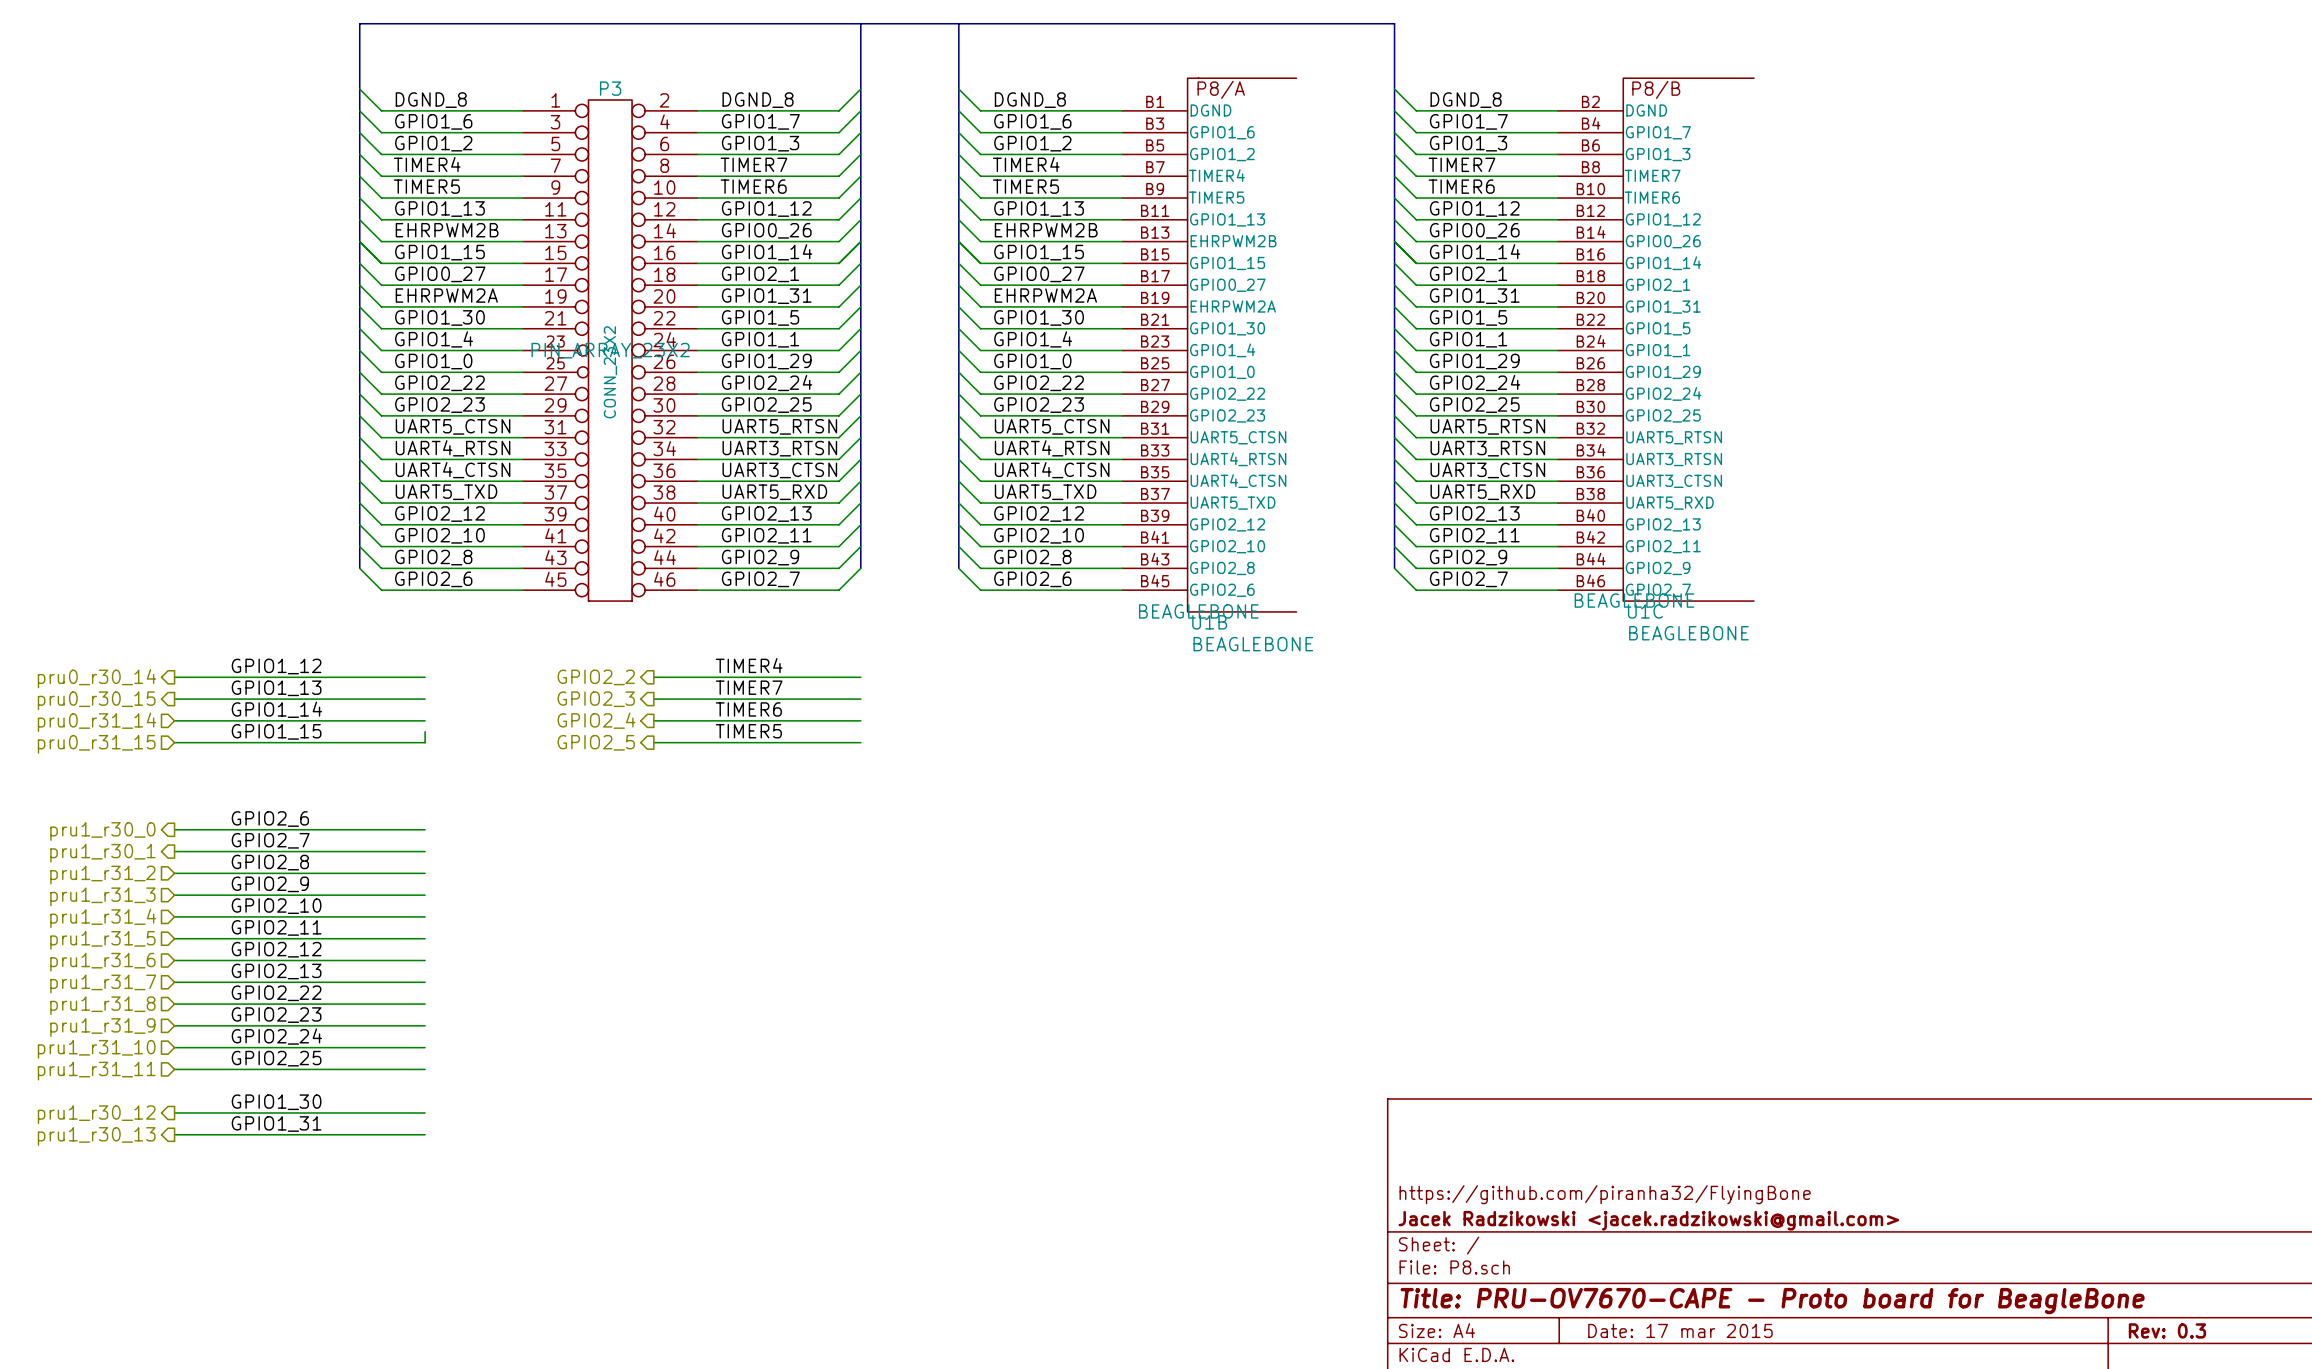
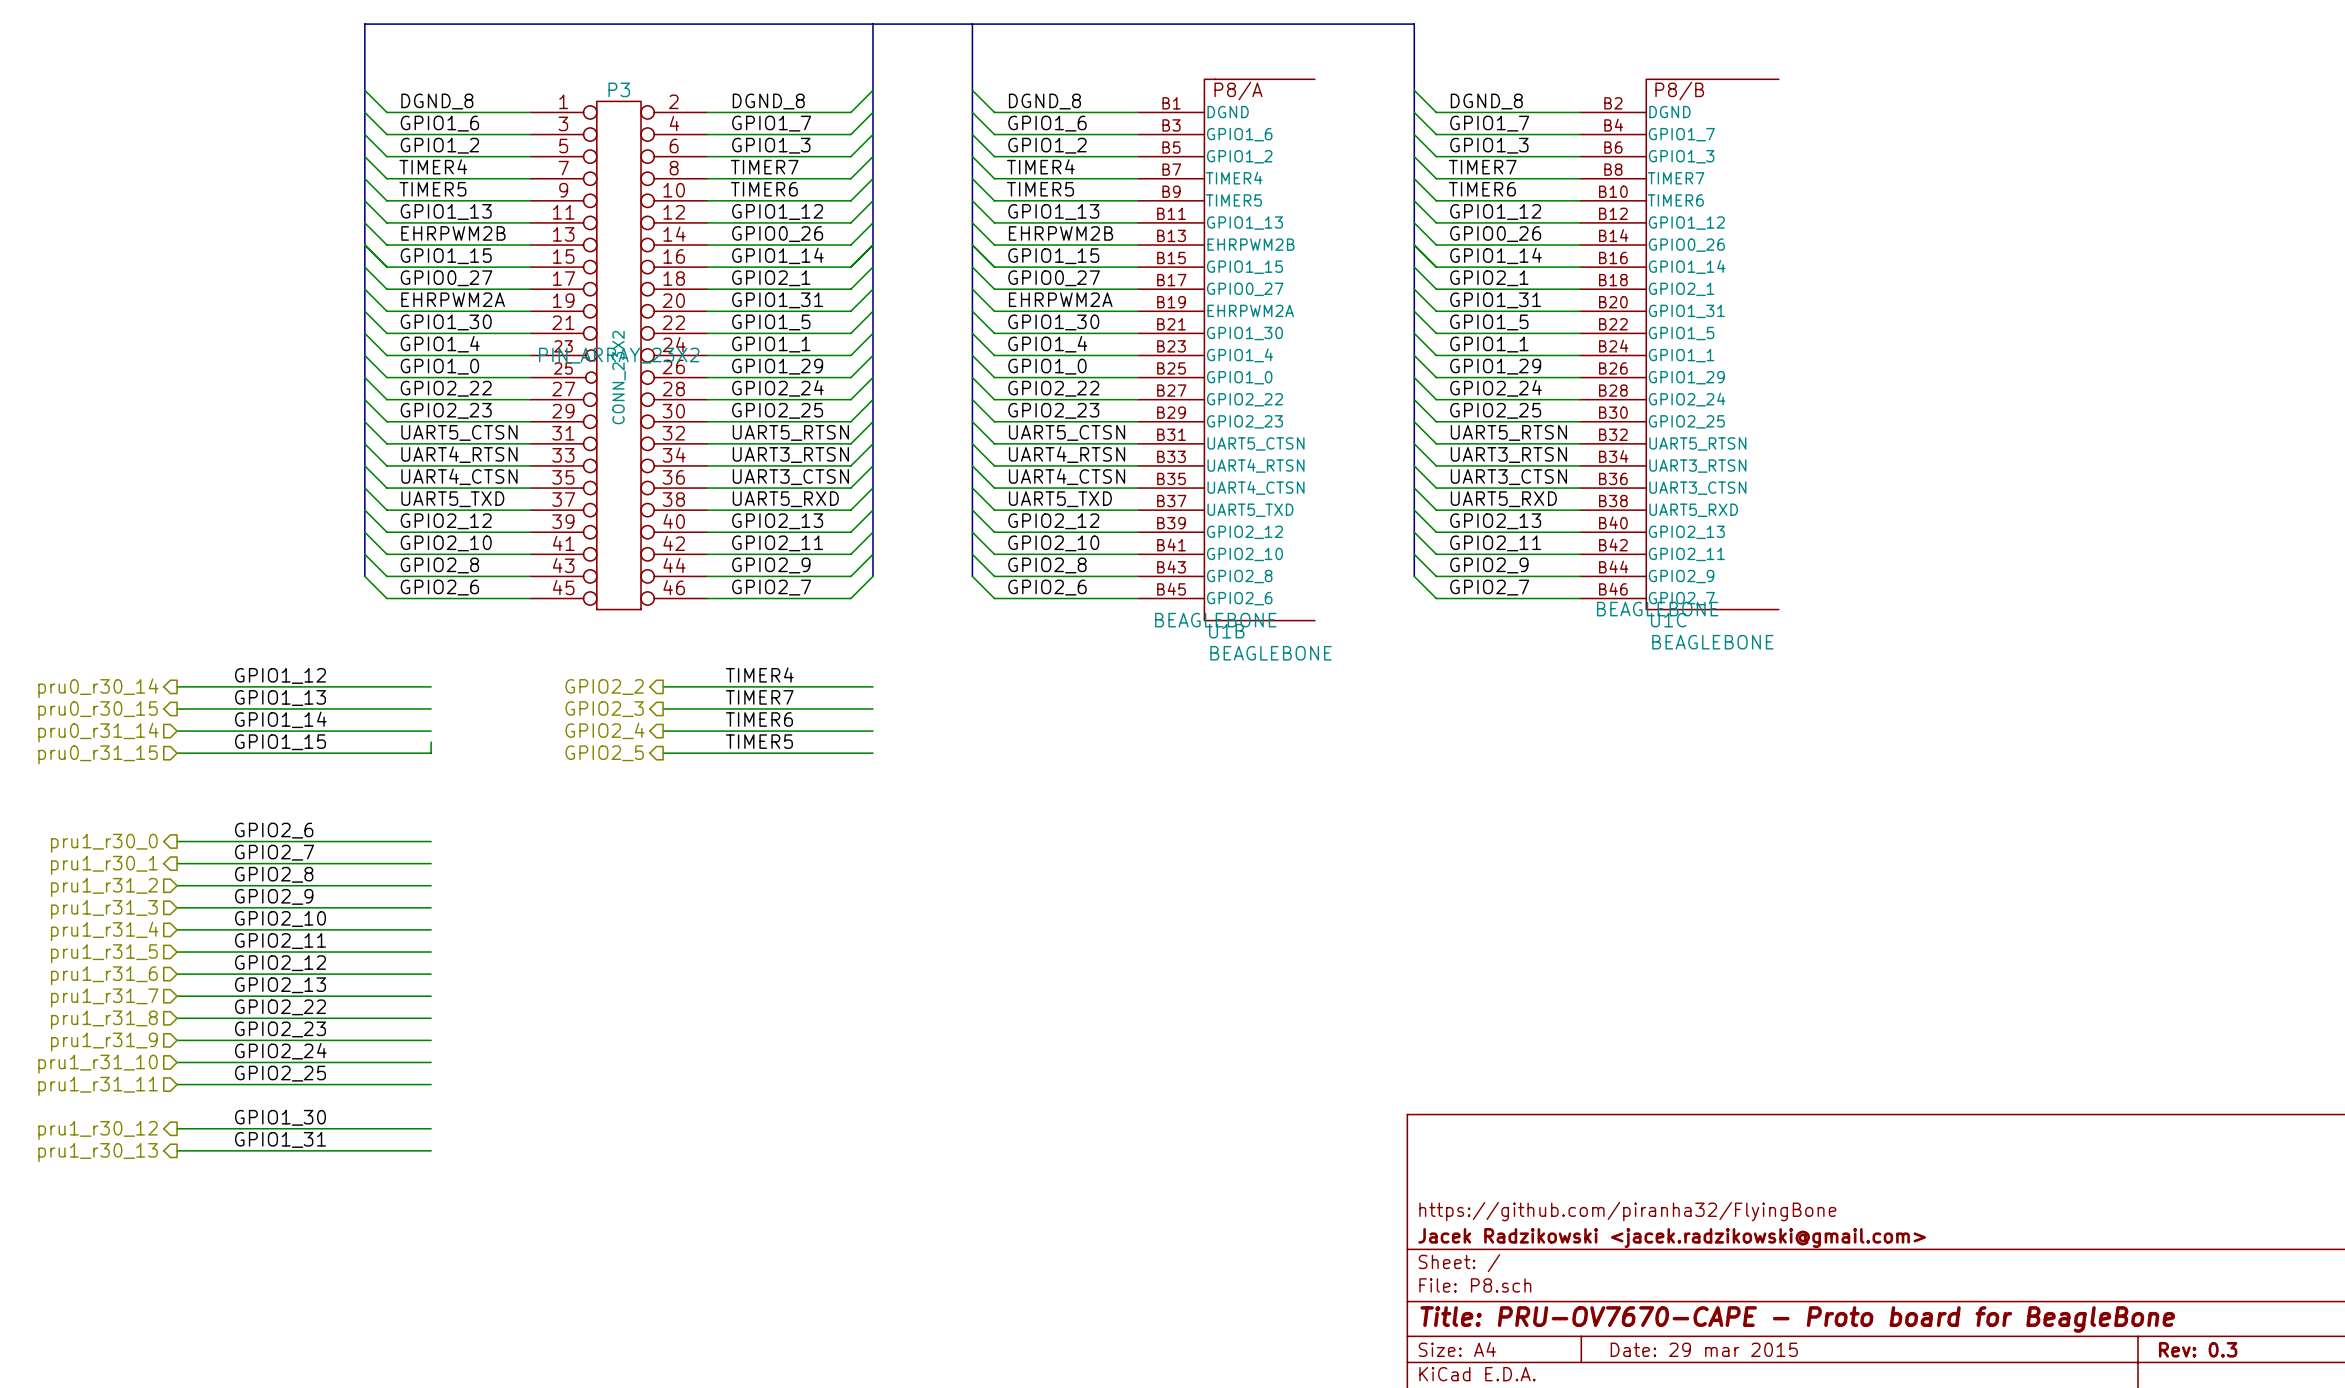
title block: Date: 17 mar 2015 (1680, 1330) -> Date: 29 mar 2015 (1704, 1349)

